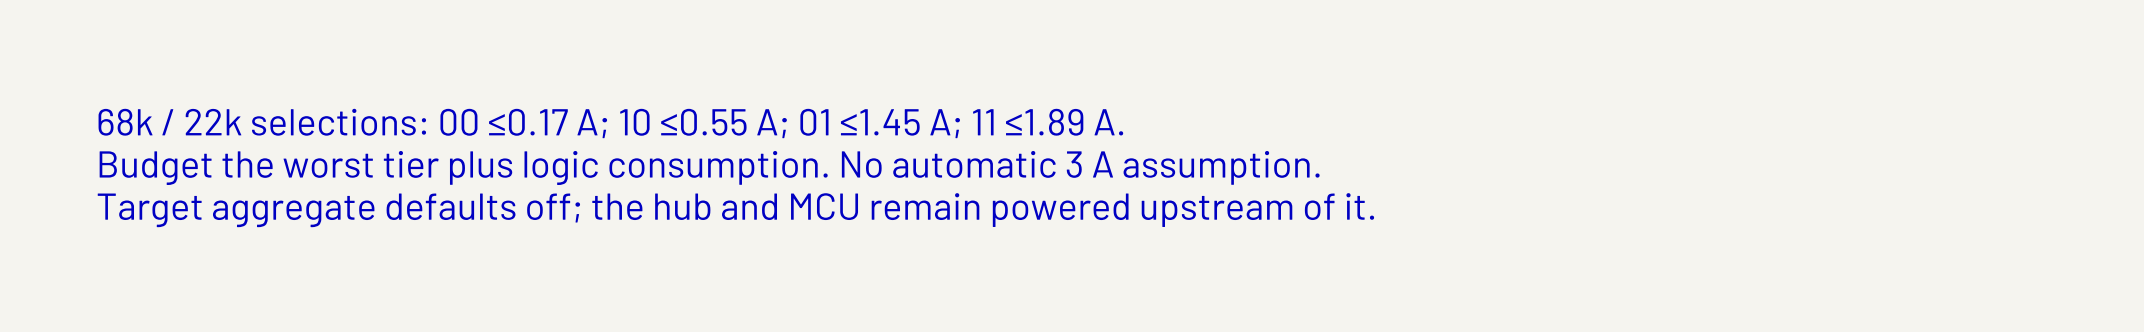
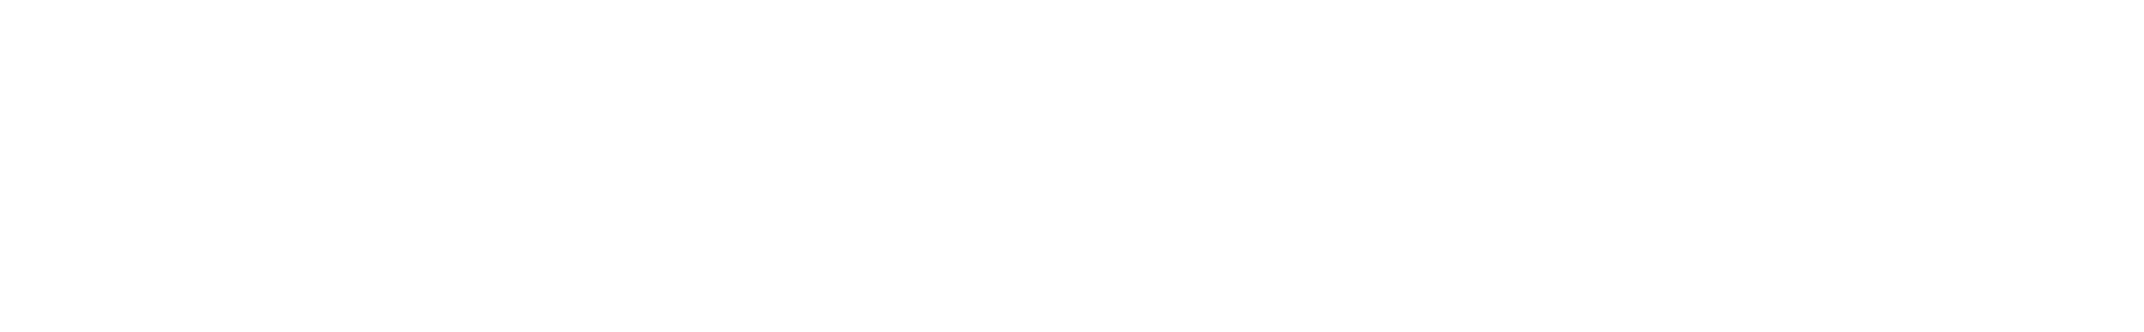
text: 68k / 22k selections: 00 ≤0.17 A; 10 ≤0.55 A; 01 ≤1.45 A; 11 ≤1.89 A. (610, 123) -> none
text: Budget the worst tier plus logic consumption. No automatic 3 A assumption. (709, 167) -> none
text: Target aggregate defaults off; the hub and MCU remain powered upstream of it. (735, 210) -> none

